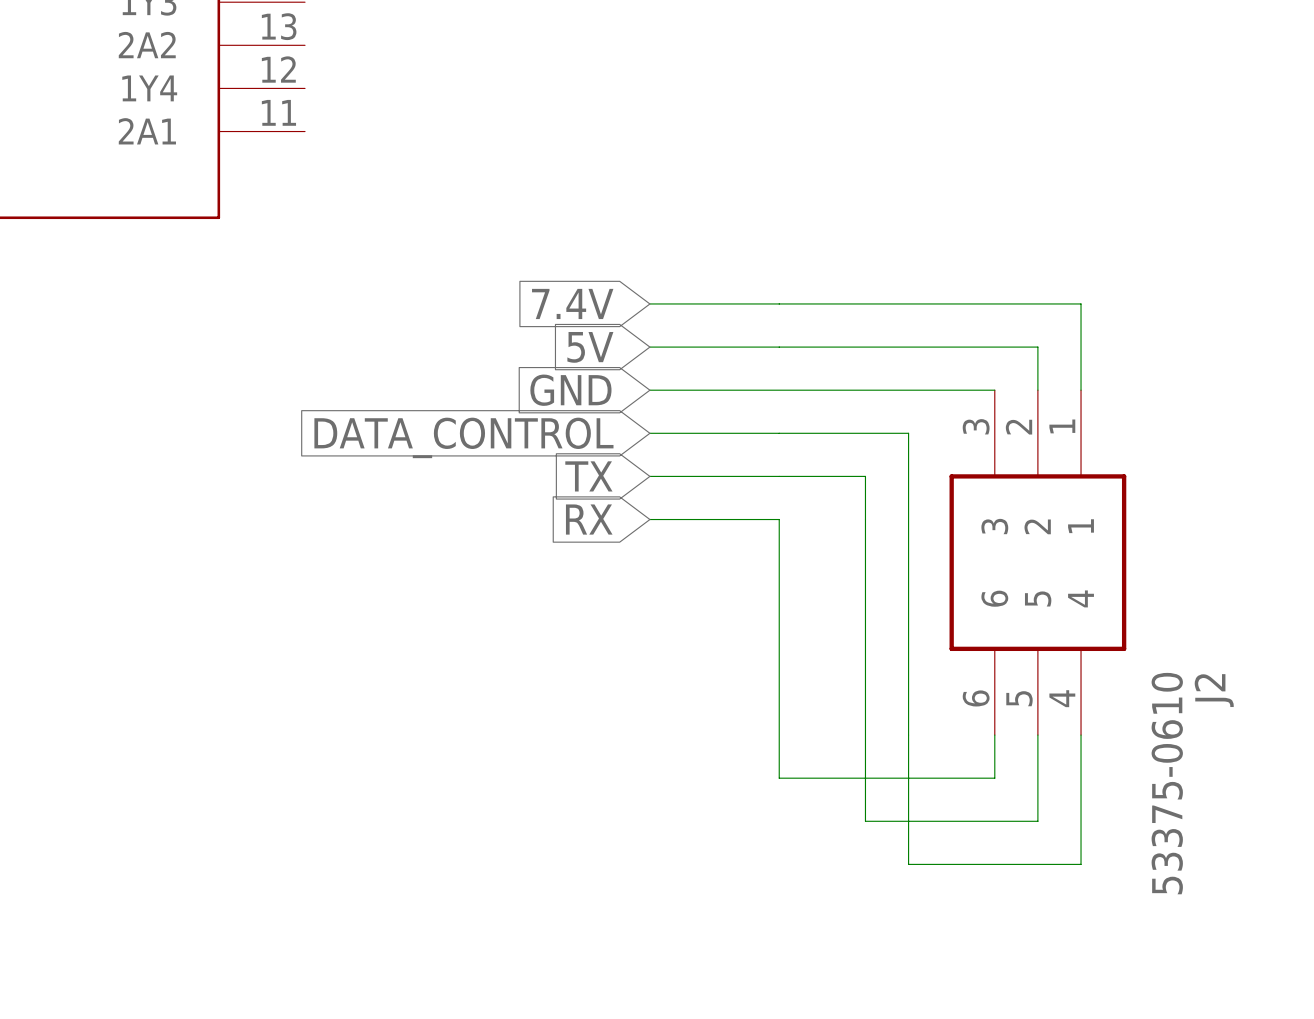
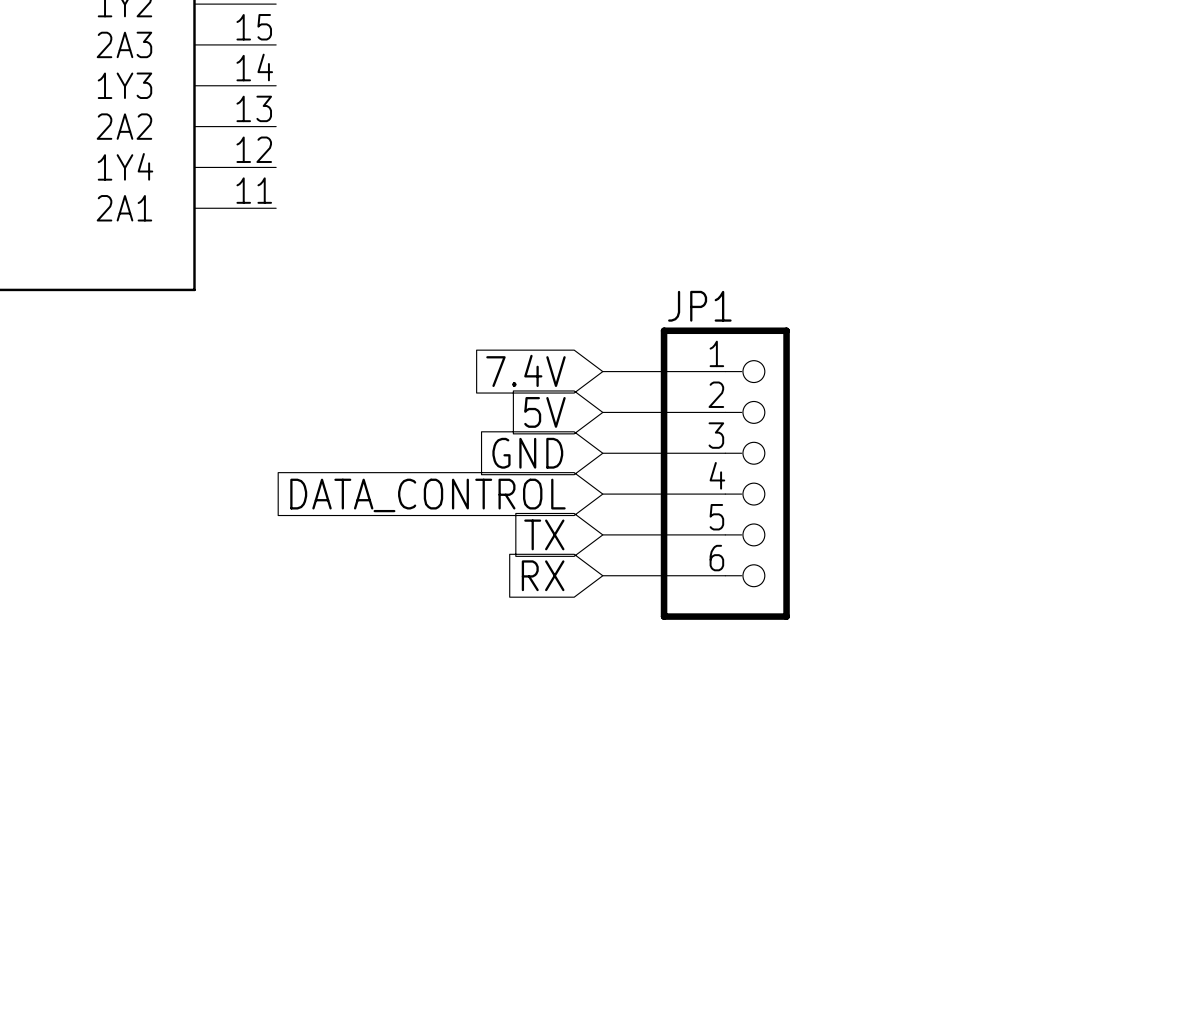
wire: (779, 303) (1081, 303) (1081, 390) -> none
wire: (779, 347) (1037, 347) (1037, 390) -> none
wire: (779, 390) (994, 390) -> none
JP1: none -> (725, 473)
wire: (779, 433) (908, 433) (908, 864) (1081, 864) (1081, 735) -> none
wire: (779, 476) (865, 476) (865, 821) (1037, 821) (1037, 735) -> none
wire: (779, 519) (779, 778) (994, 778) (994, 735) -> none
J2: 53375-0610 (1037, 562) -> none

